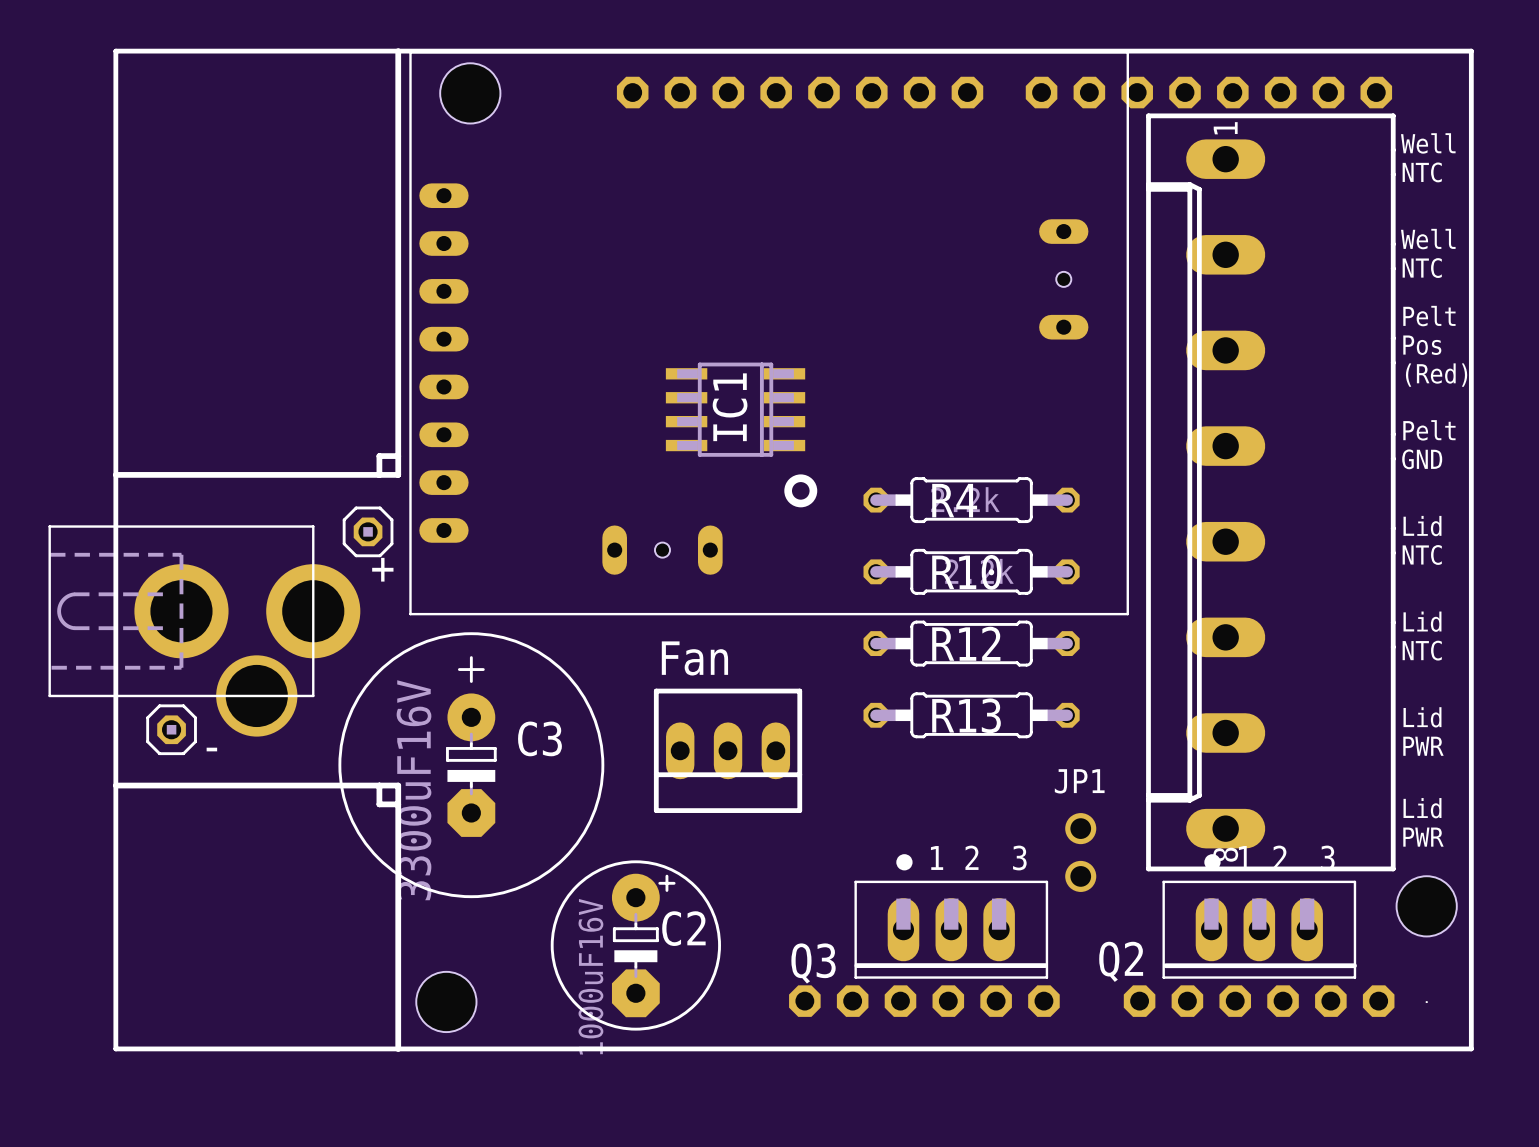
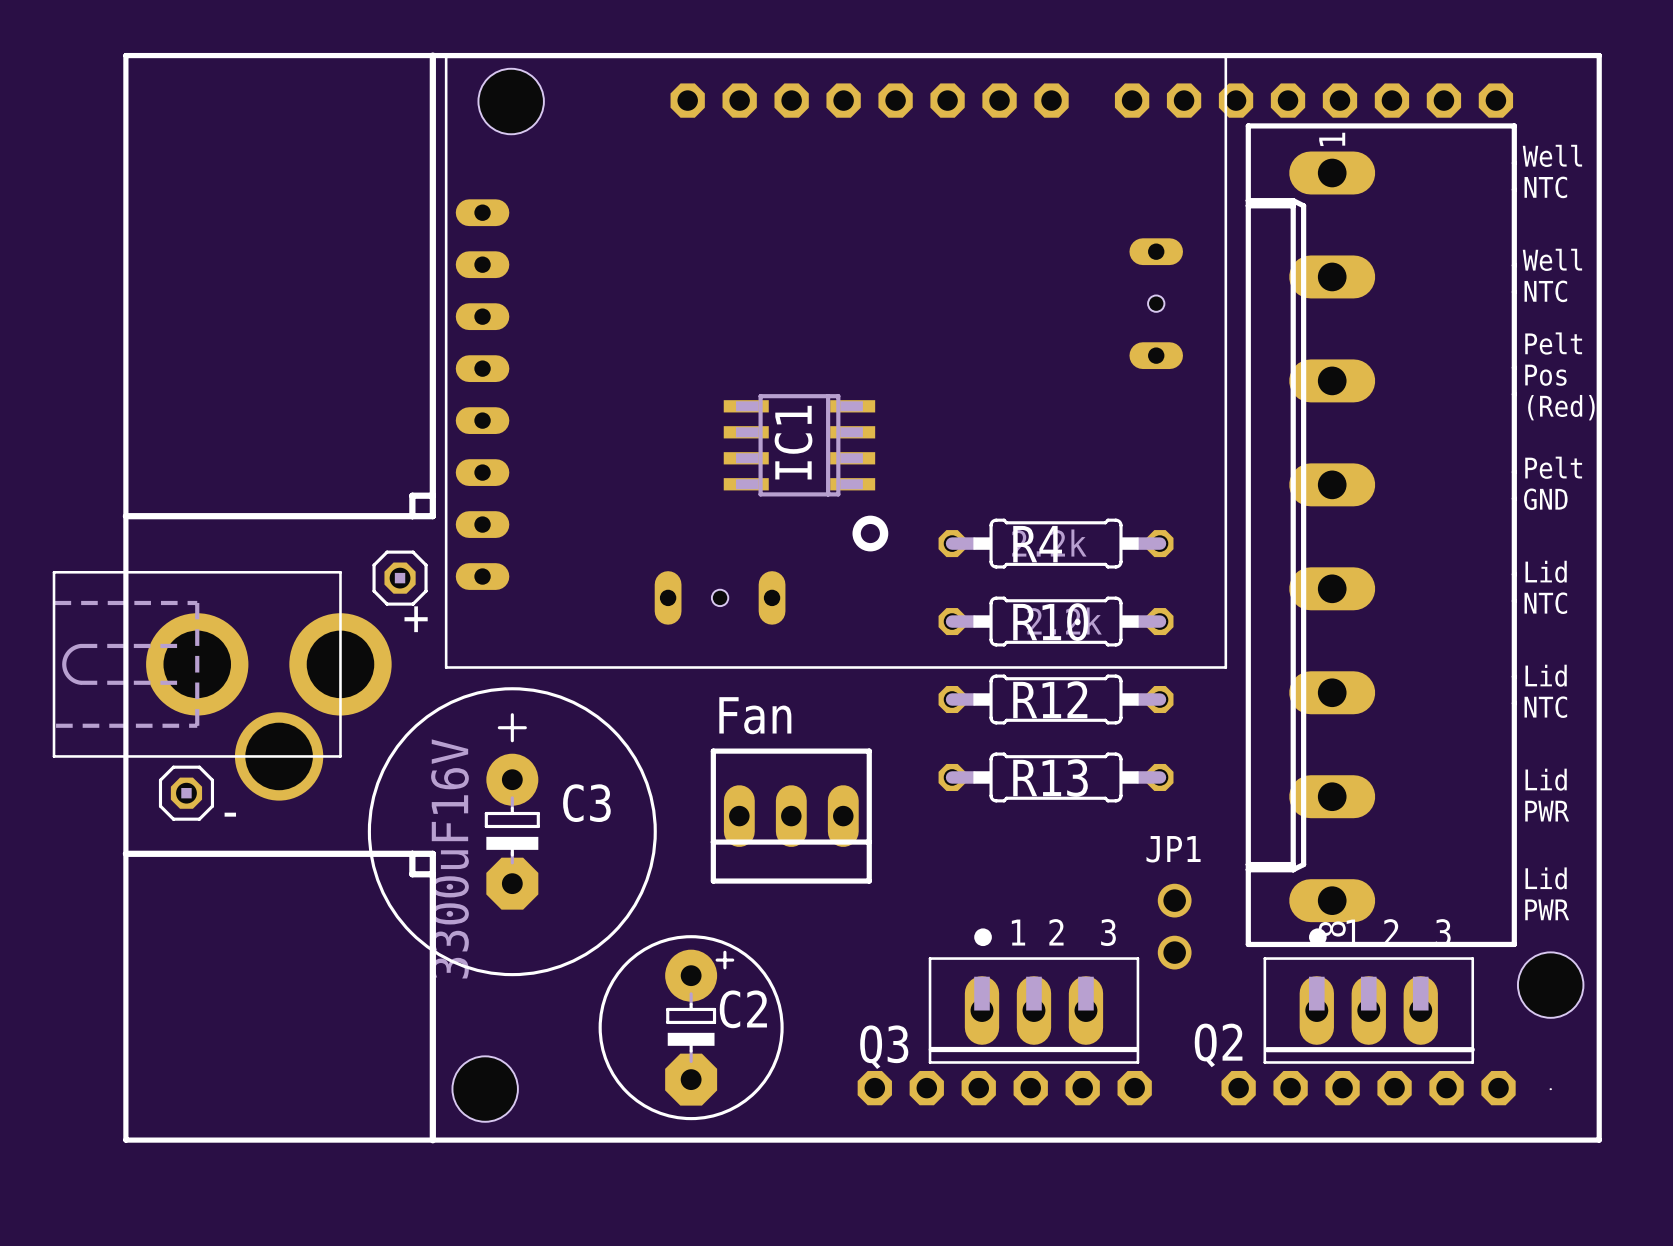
part value: 1000uF16V (590, 976) -> none

